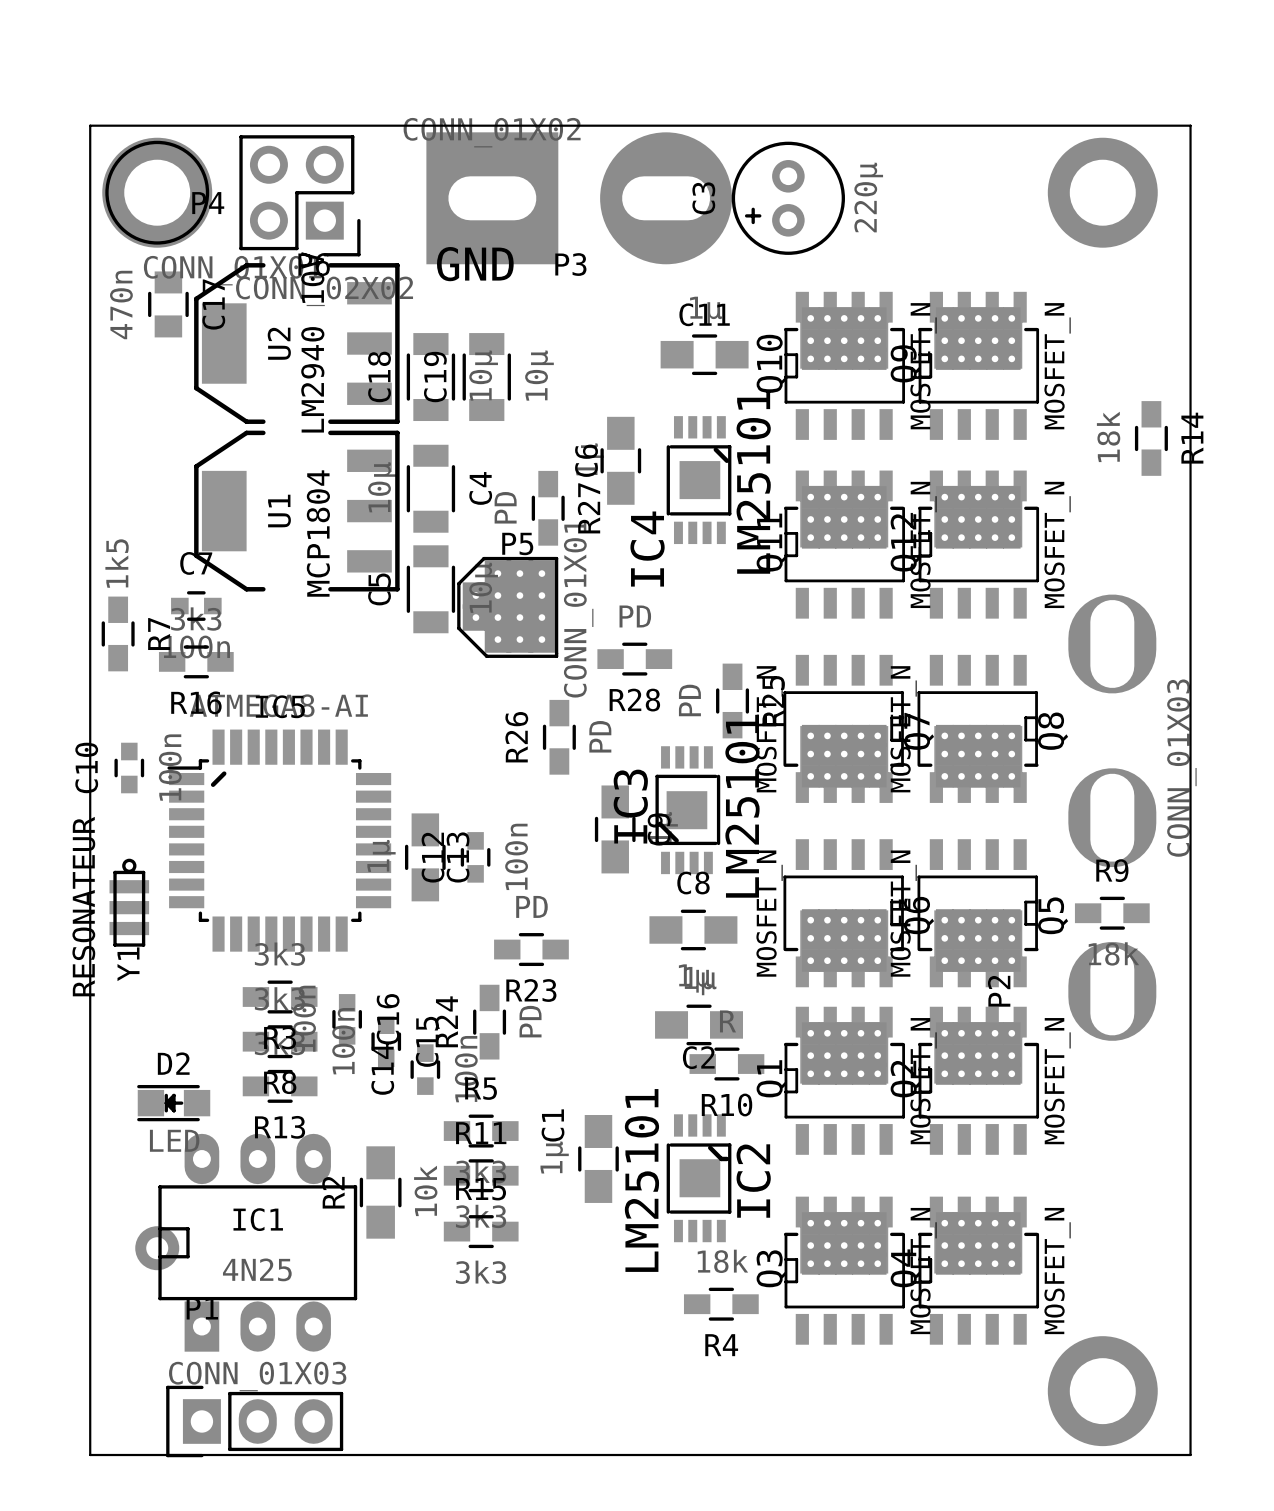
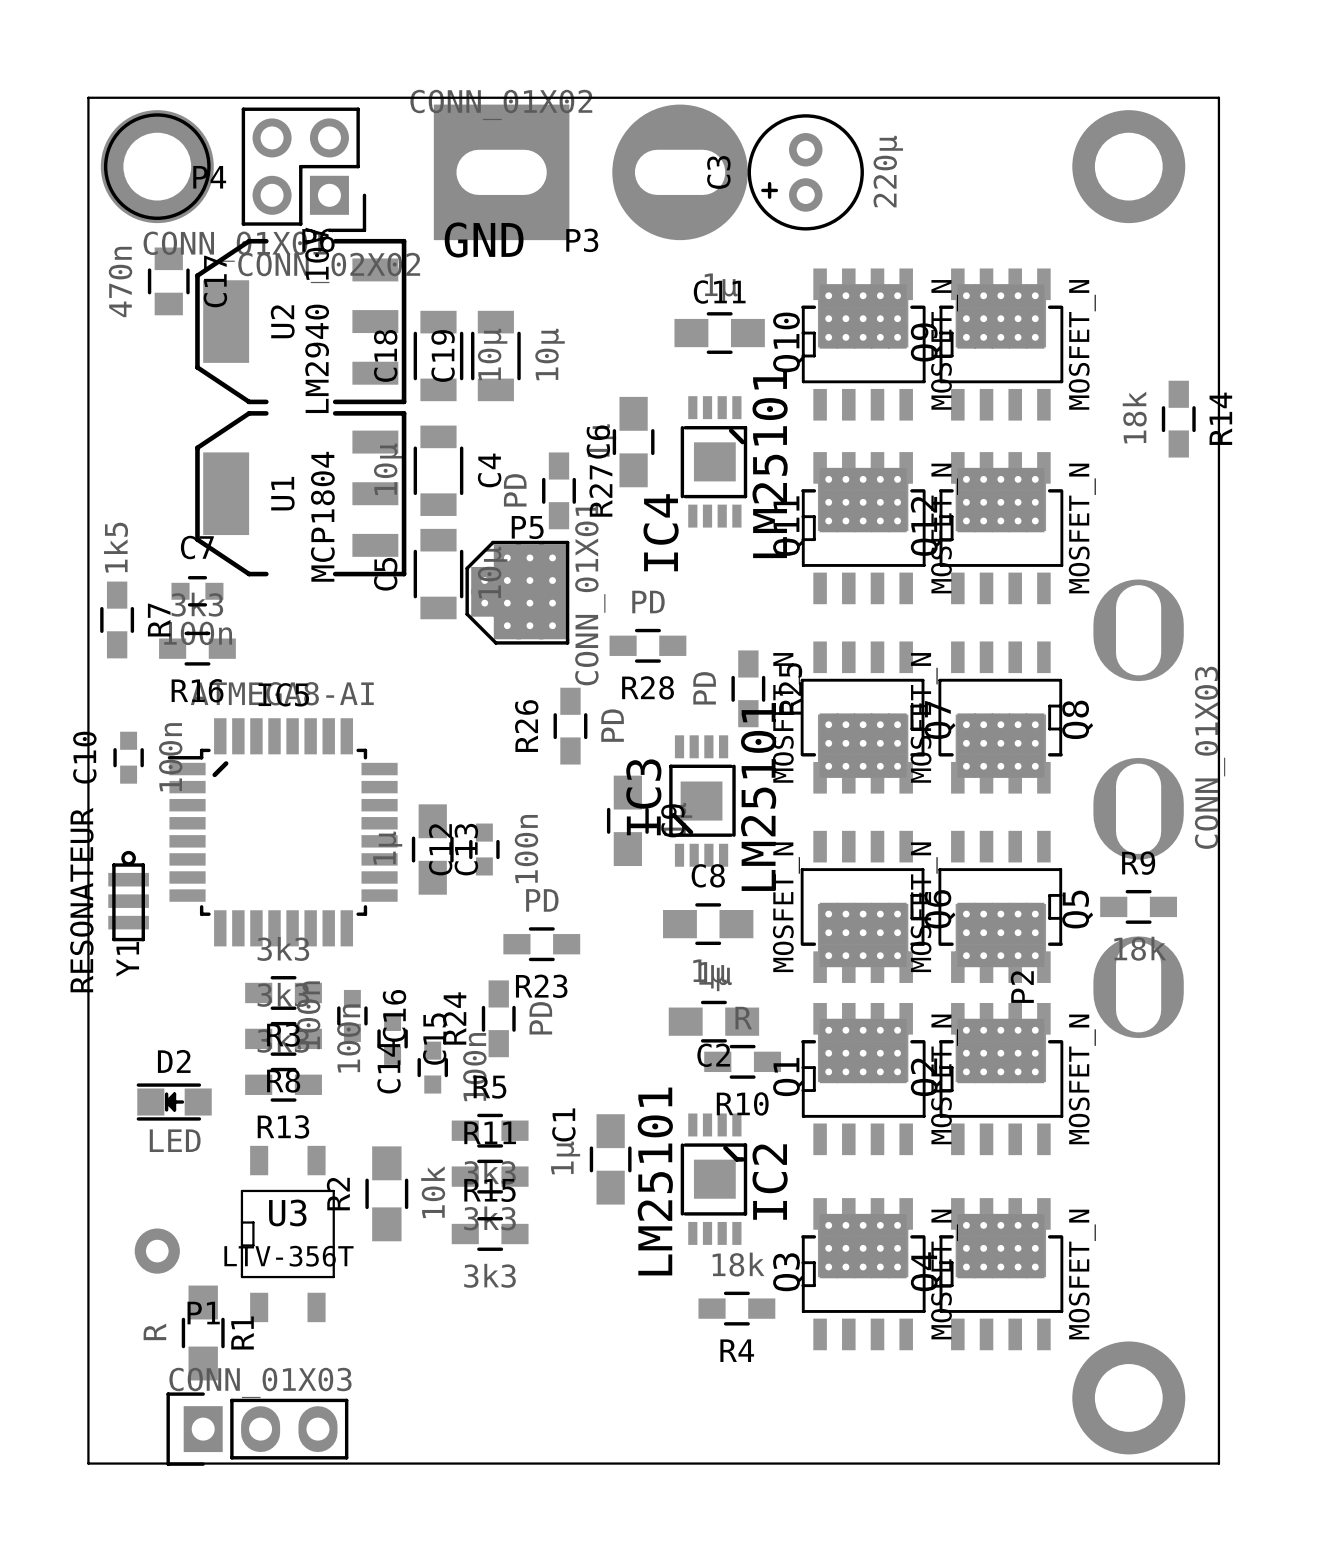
U3: none -> LTV-356T (287, 1234)
IC1: 4N25 (257, 1242) -> none
R1: none -> R (203, 1332)

